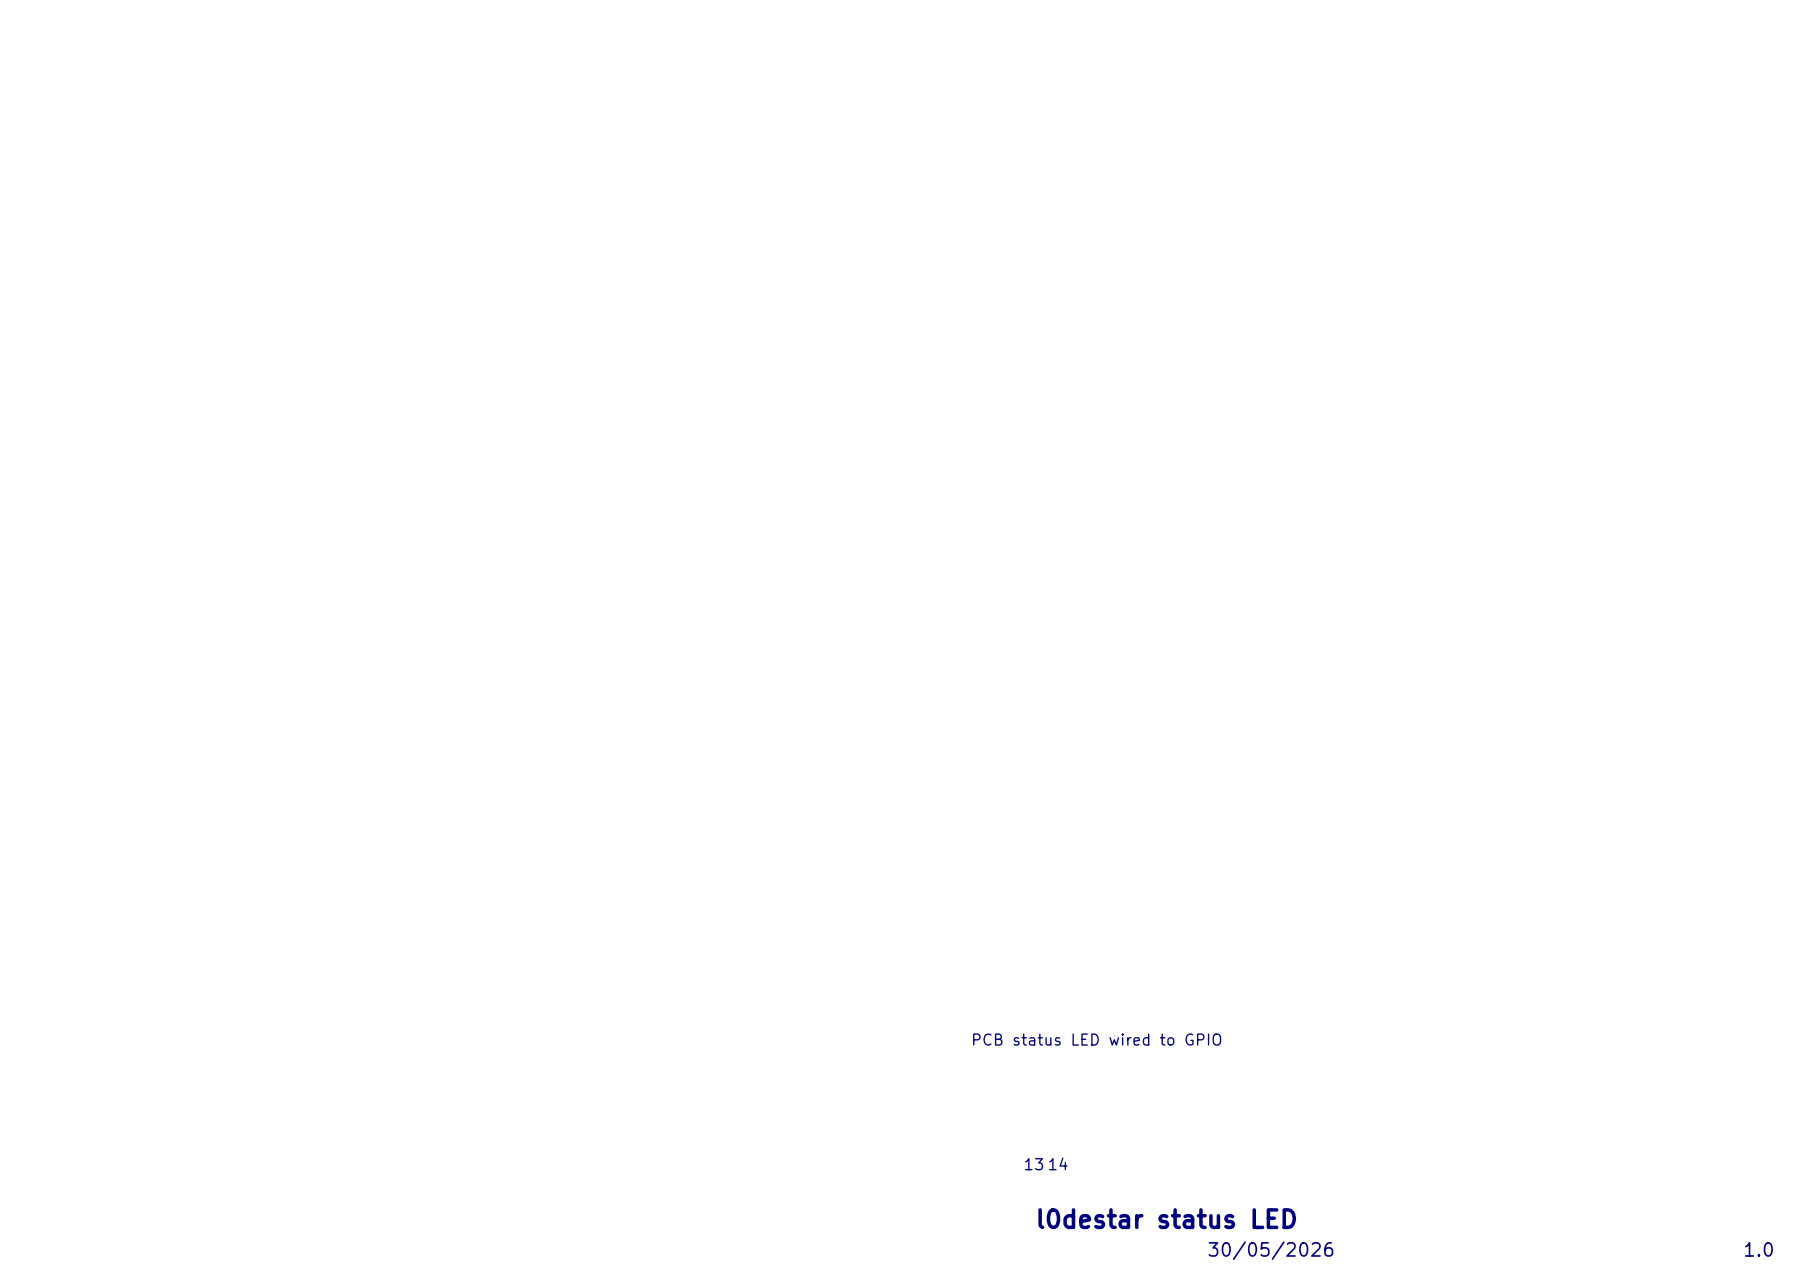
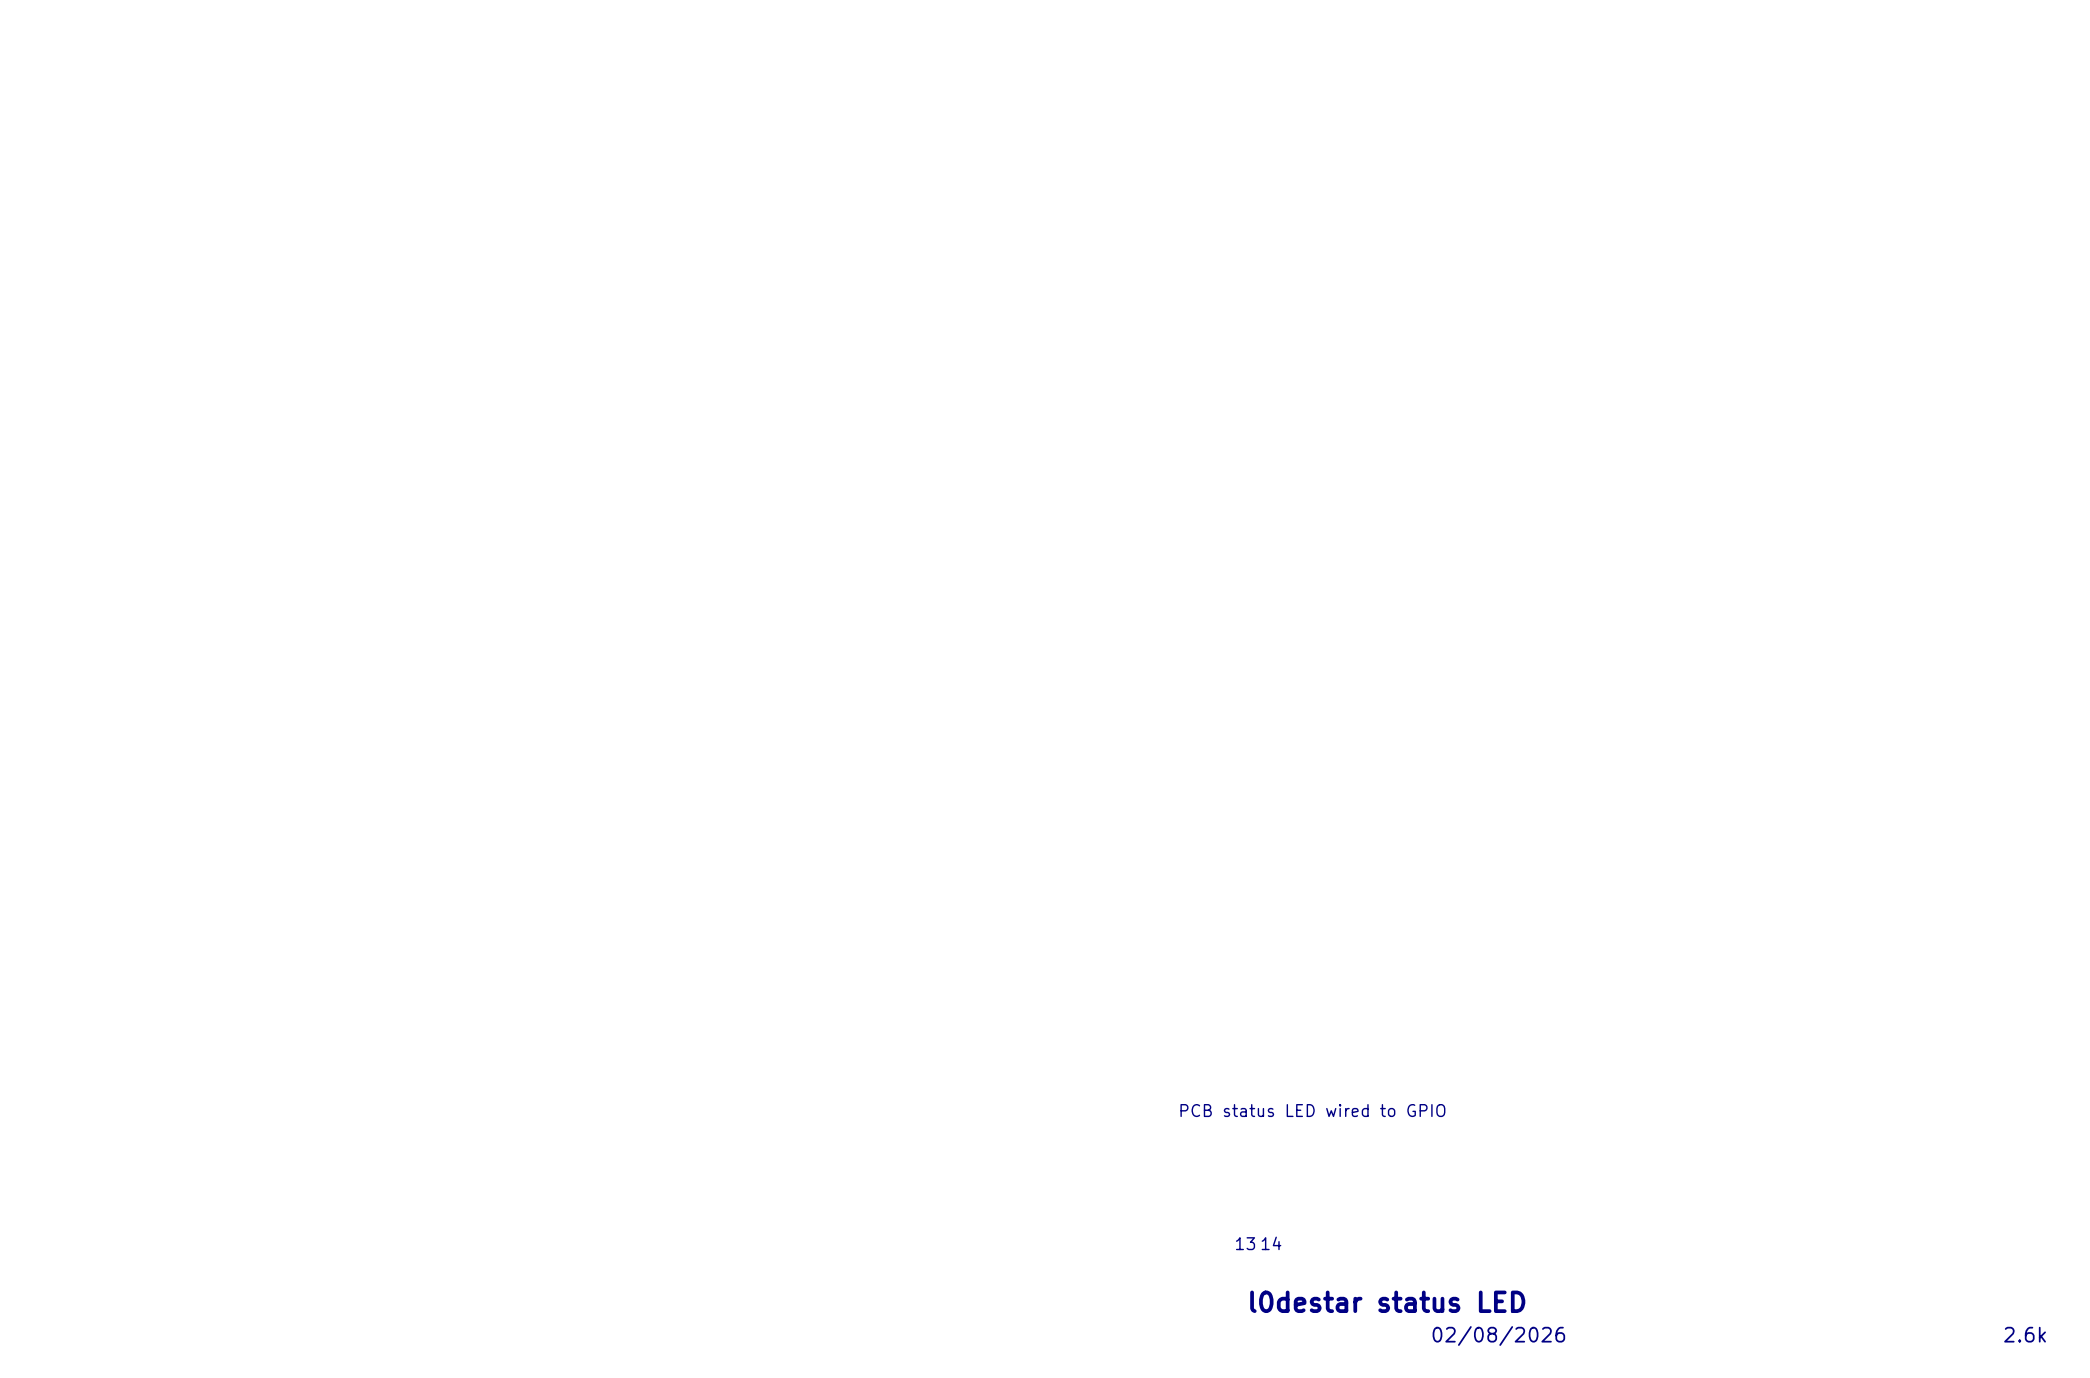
text: 1.0 (1758, 1249) -> 2.6k (2025, 1334)
text: 30/05/2026 (1270, 1250) -> 02/08/2026 (1498, 1336)

